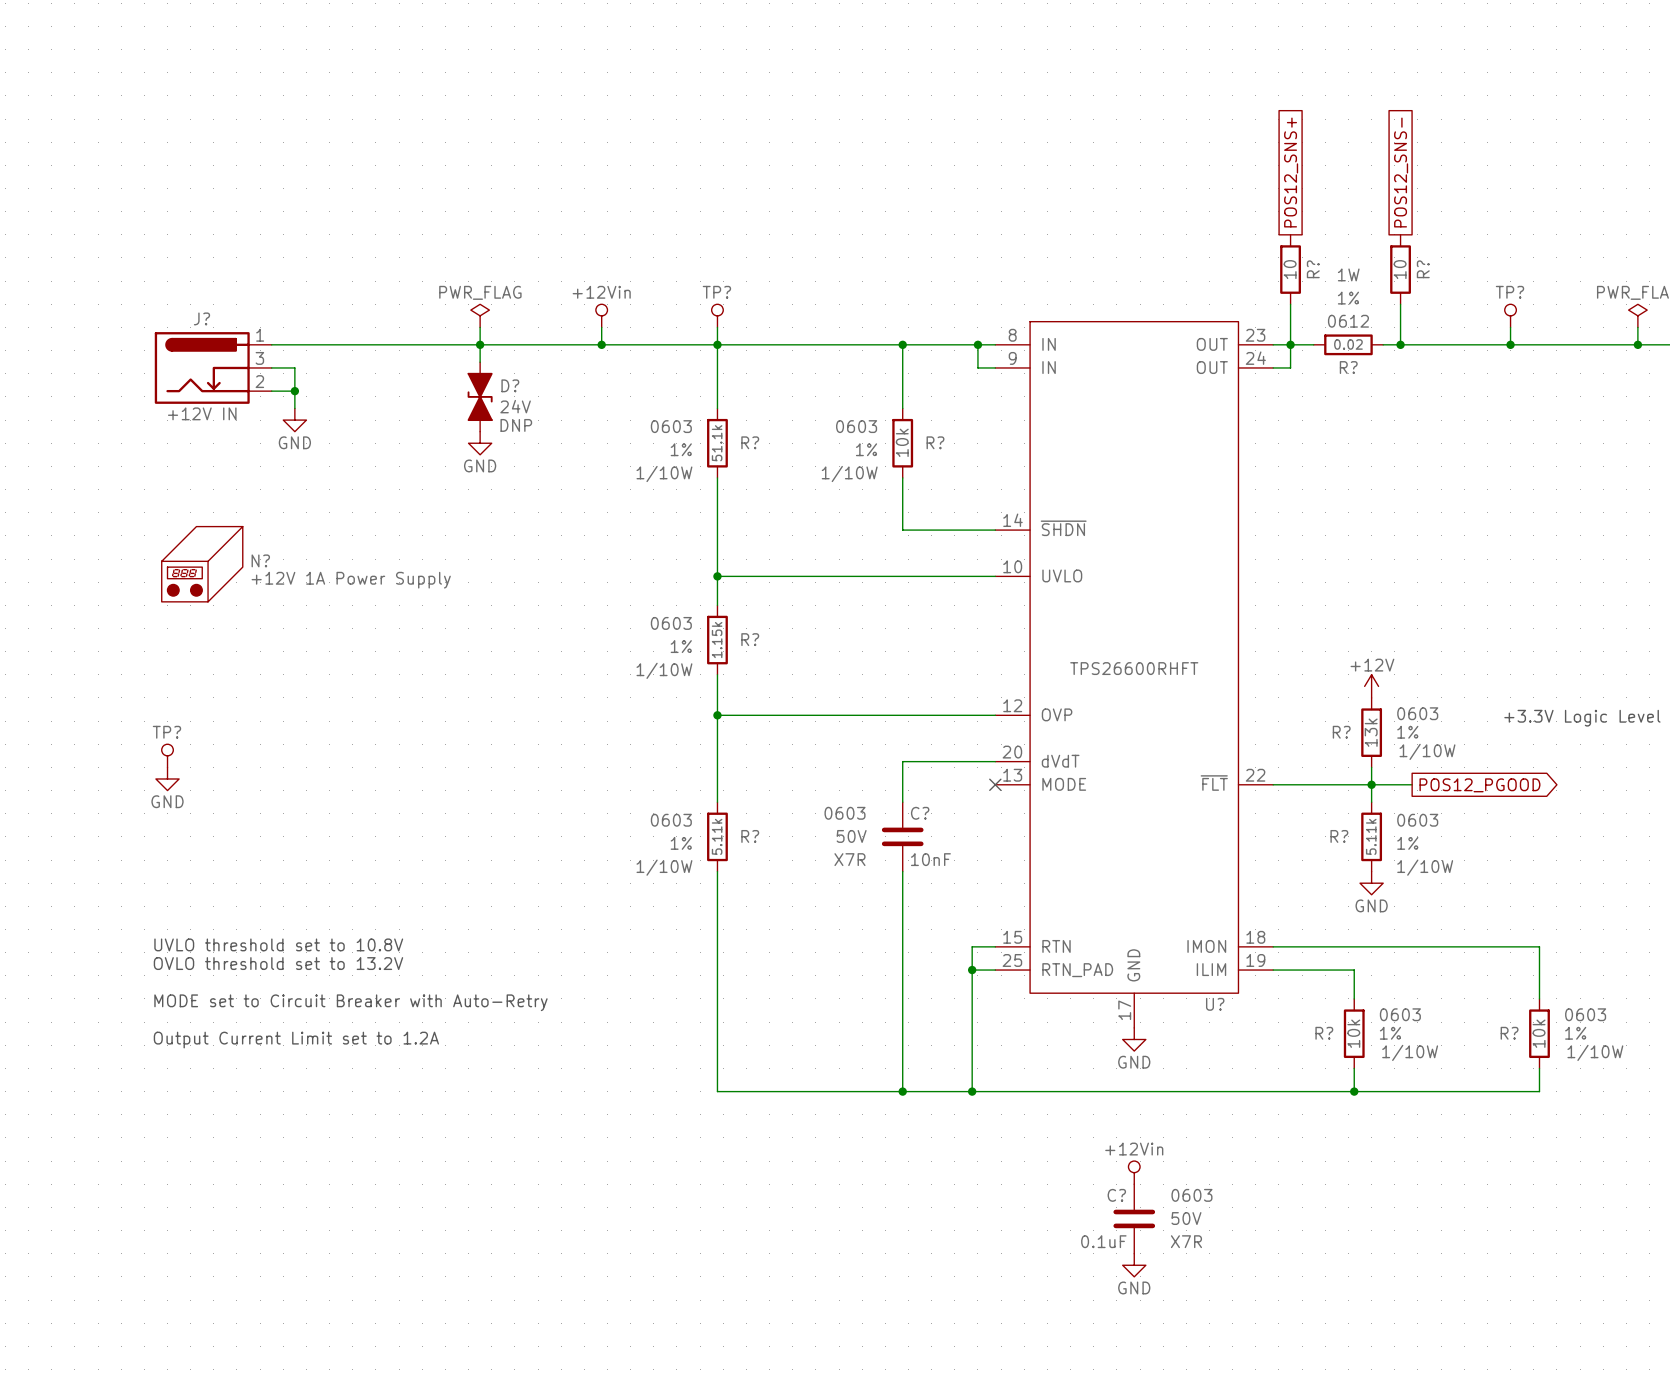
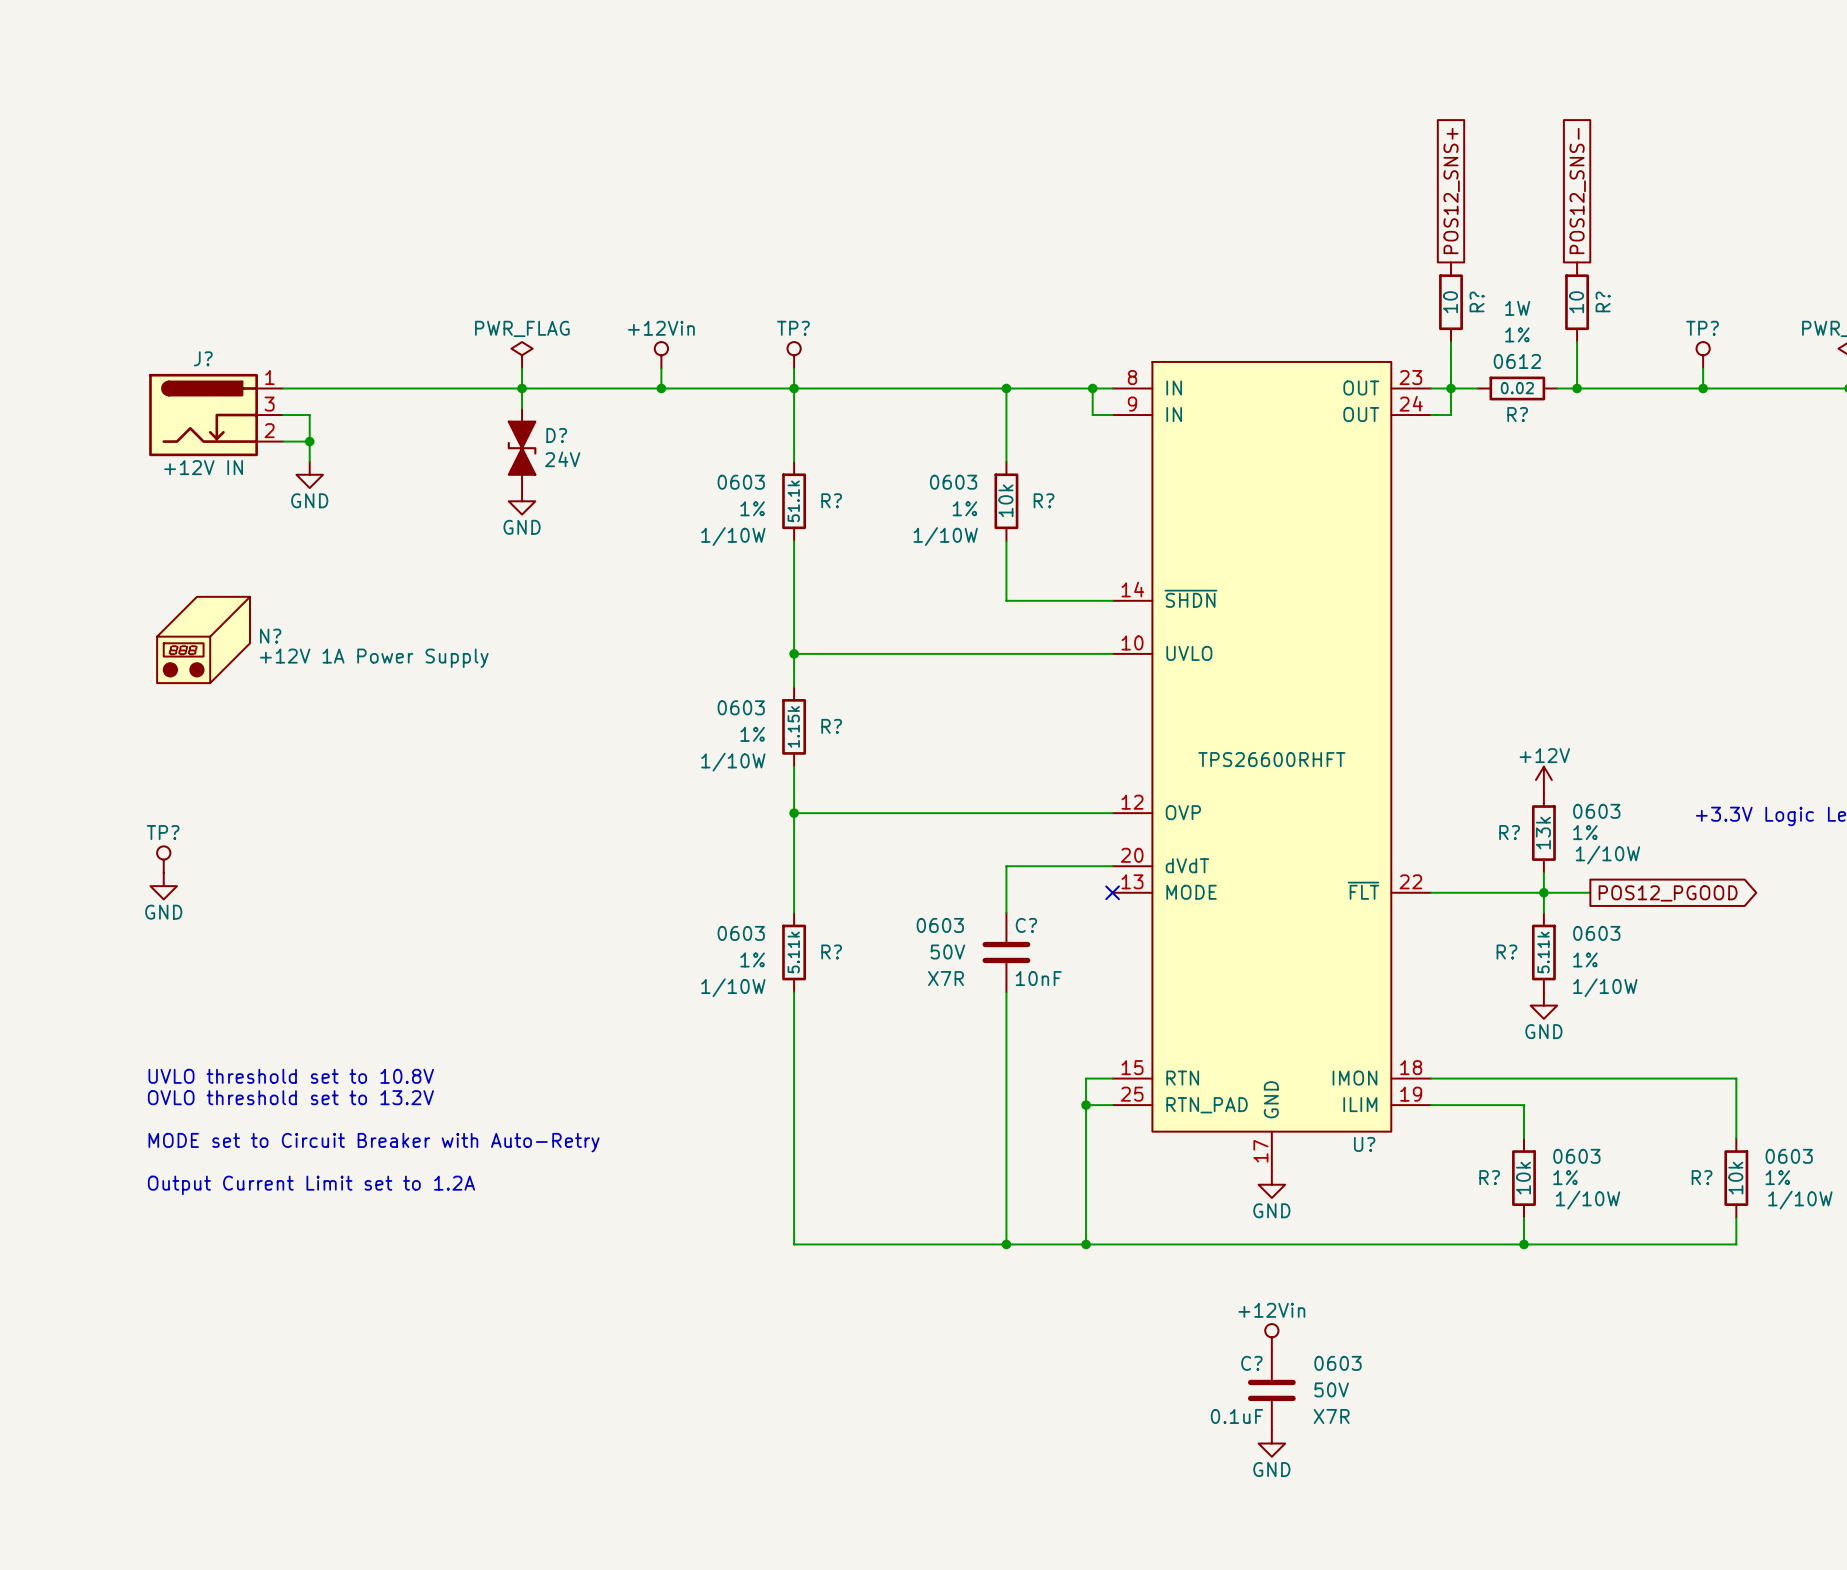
D? text: DNP (516, 425) -> none

